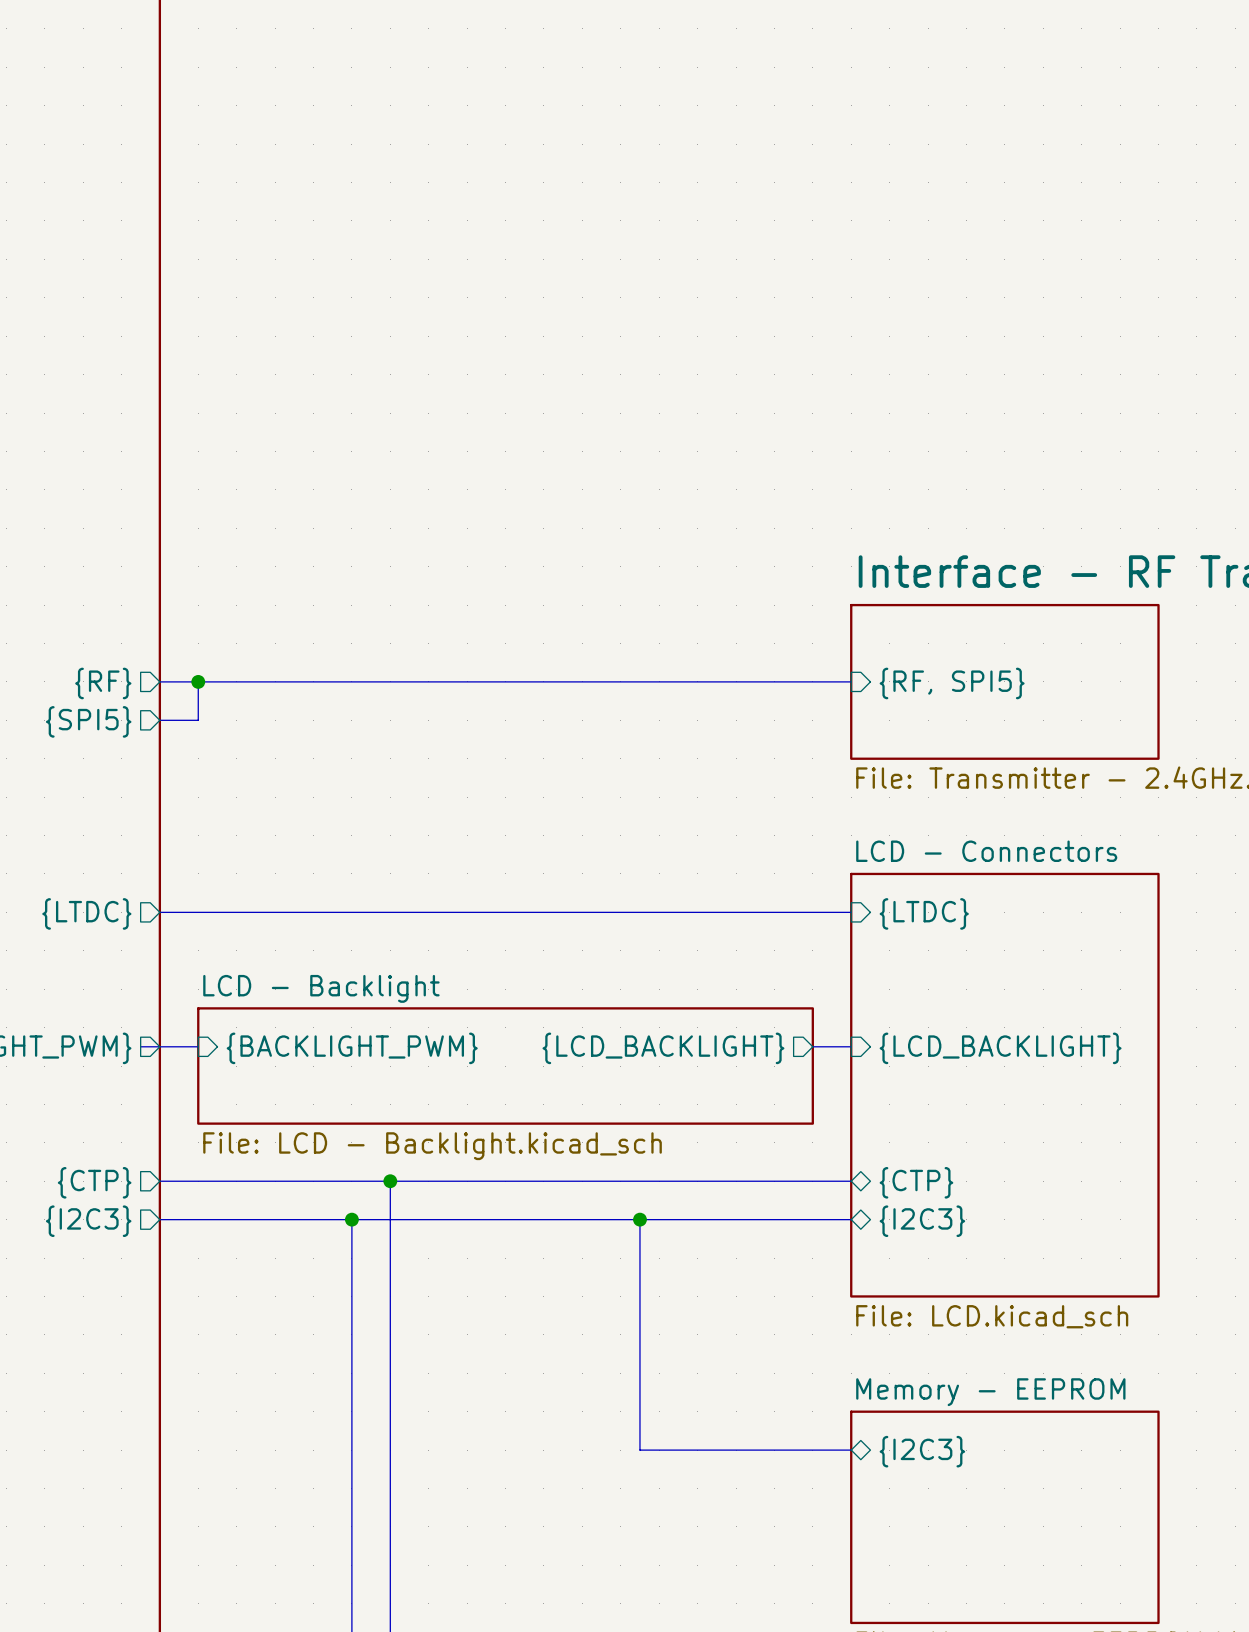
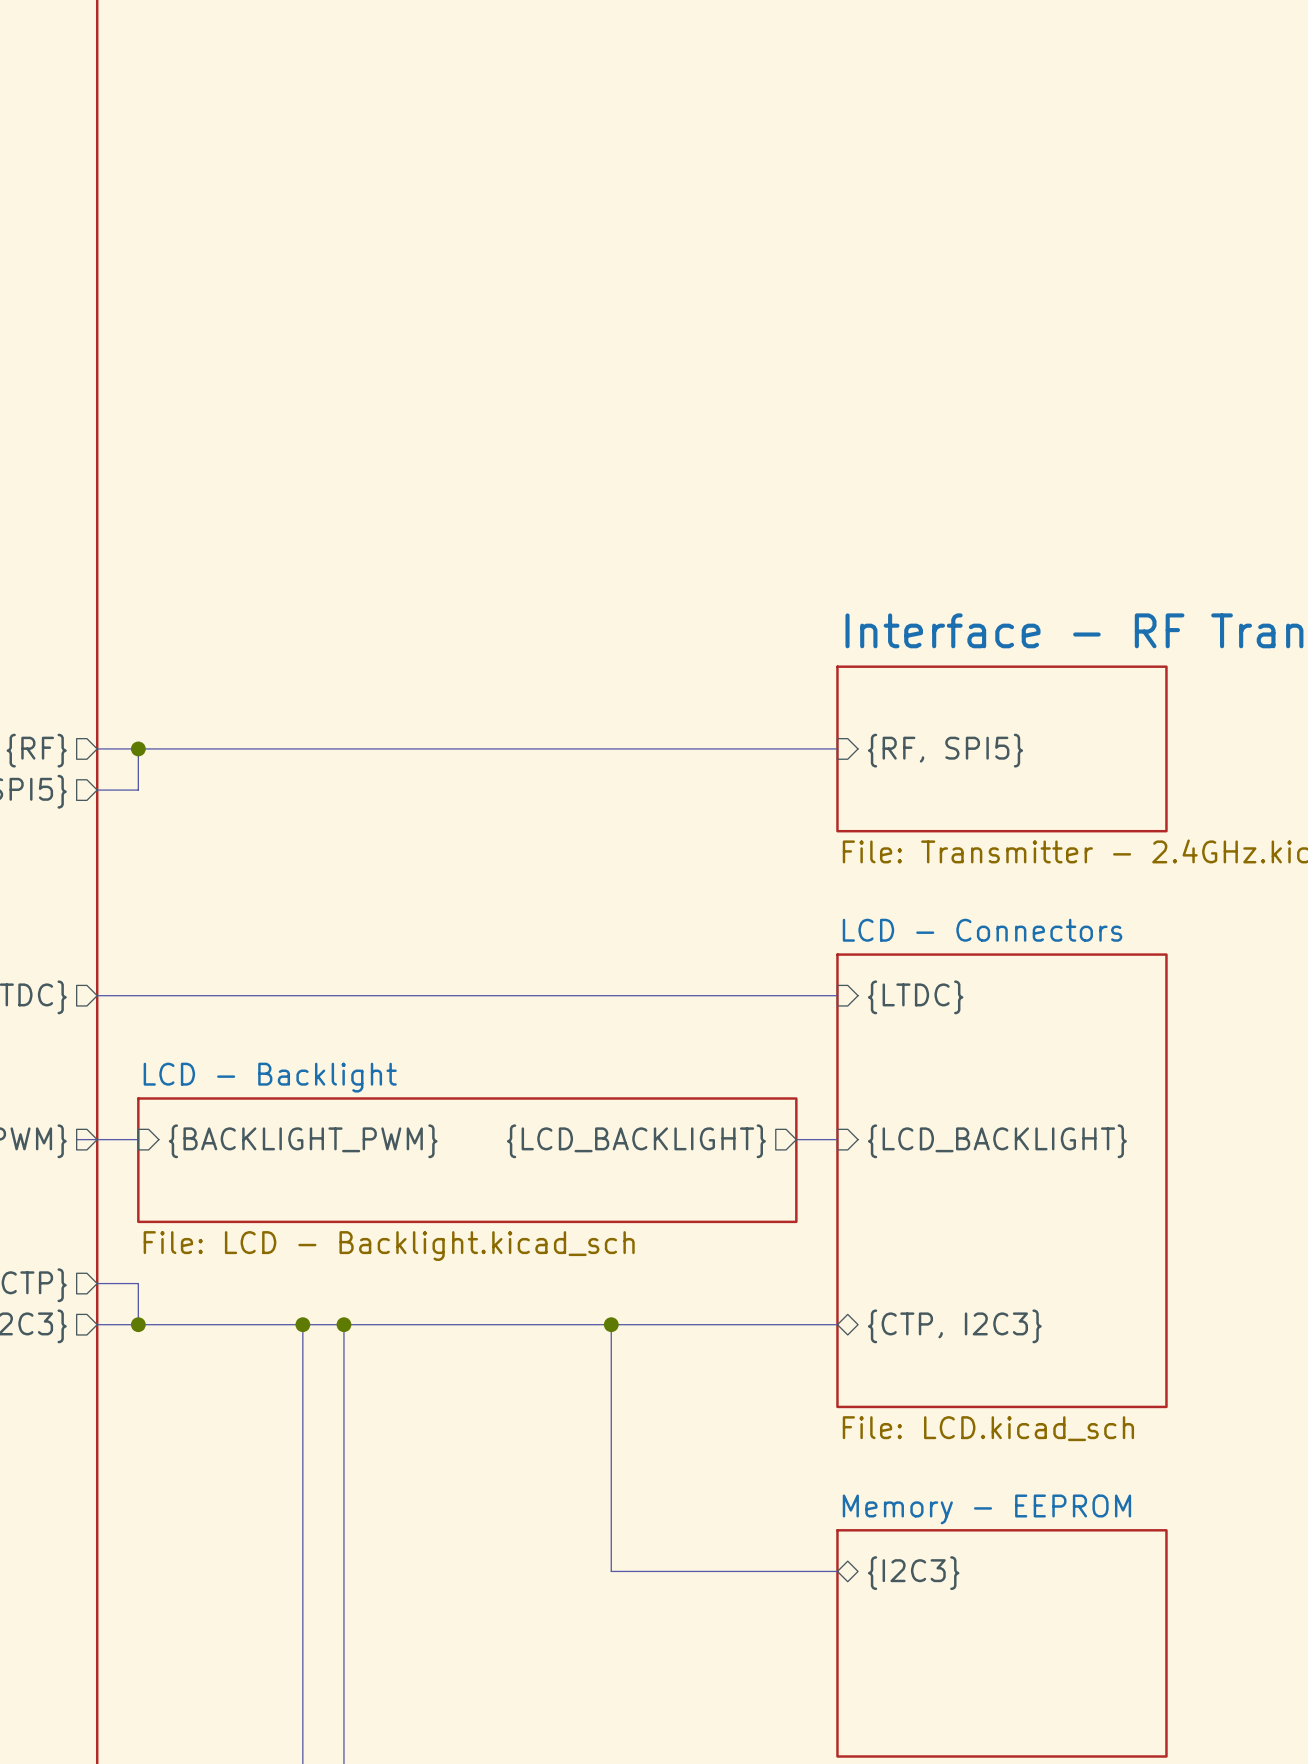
bus: (198, 1181) (851, 1181) -> (138, 1283) (138, 1324)
bus: (390, 1181) (390, 1219) -> none
junction position: (390, 1181) -> (343, 1324)
sheet pin: {CTP} (916, 1182) -> none
junction: none -> (138, 1324)
sheet pin: {I2C3} (922, 1221) -> {CTP, I2C3} (954, 1326)

